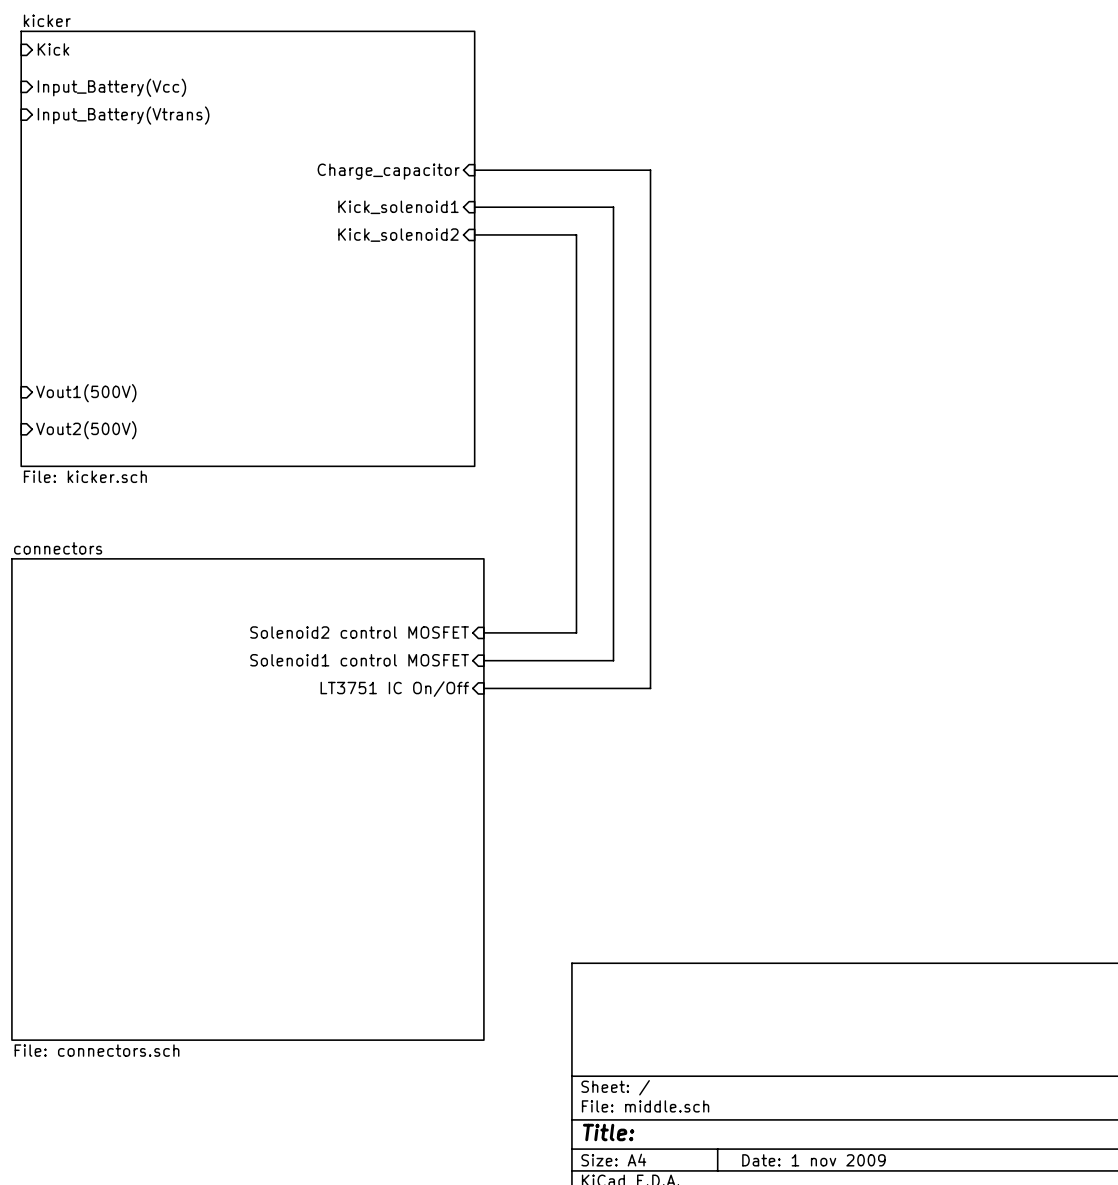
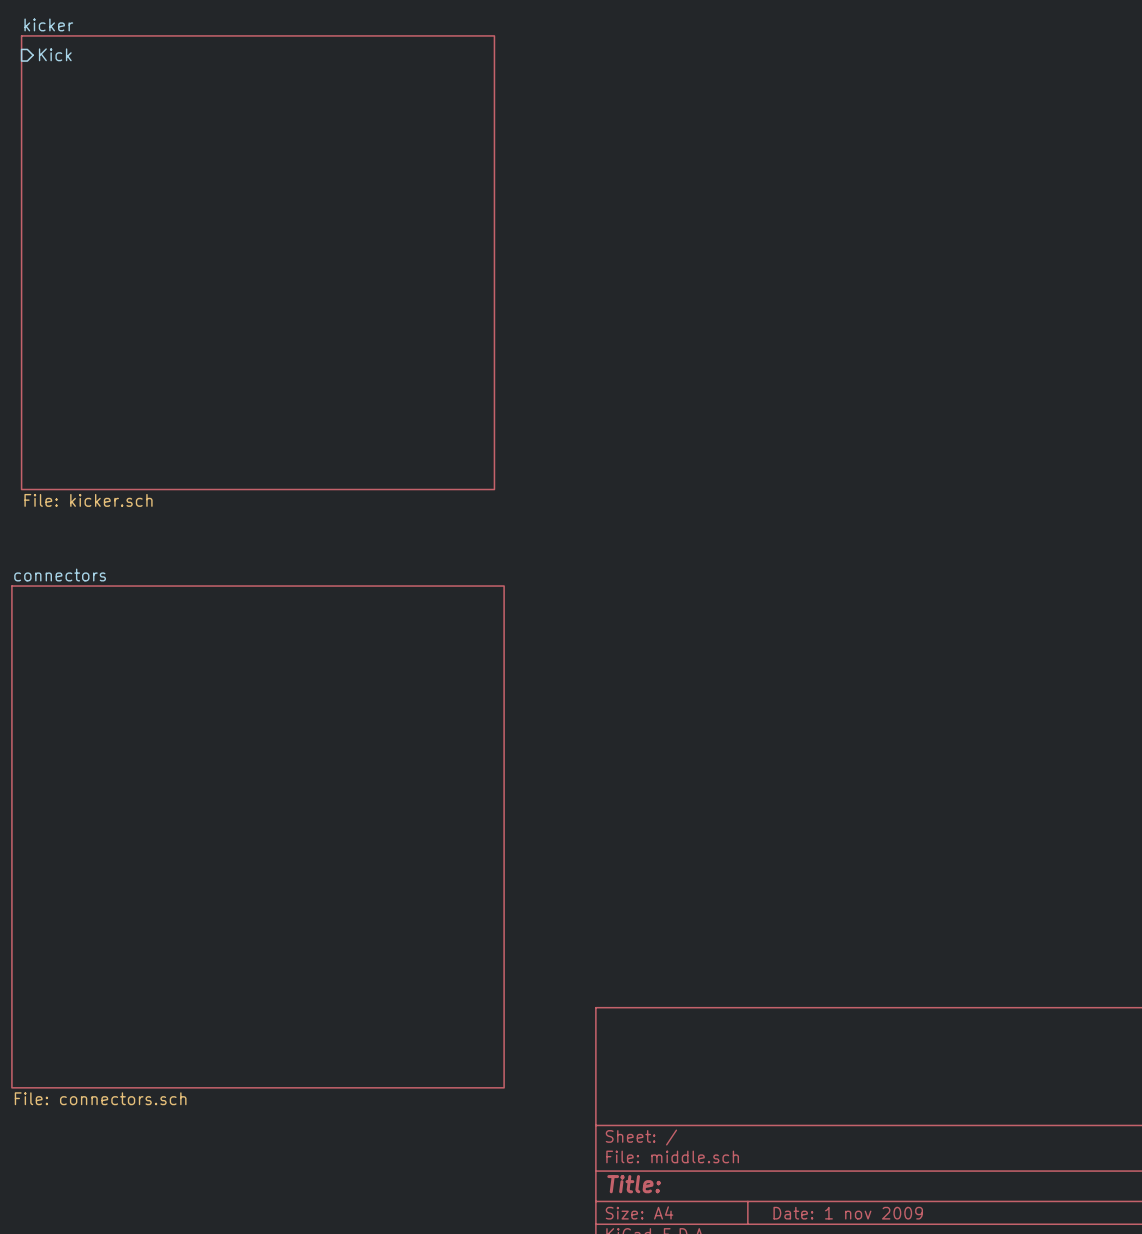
sheet pin: Input_Battery(Vcc) (111, 87) -> none
sheet pin: Input_Battery(Vtrans) (123, 115) -> none
wire: (474, 170) (650, 170) (650, 688) (483, 688) -> none
sheet pin: Charge_capacitor (388, 171) -> none
sheet pin: Kick_solenoid1 (398, 207) -> none
wire: (474, 207) (613, 207) (613, 660) (483, 660) -> none
wire: (474, 234) (576, 234) (576, 632) (483, 632) -> none
sheet pin: Kick_solenoid2 (398, 235) -> none
sheet pin: Vout1(500V) (86, 393) -> none
sheet pin: Vout2(500V) (86, 430) -> none
sheet pin: Solenoid2 control MOSFET (359, 632) -> none
sheet pin: Solenoid1 control MOSFET (359, 660) -> none
sheet pin: LT3751 IC On/Off (394, 689) -> none

